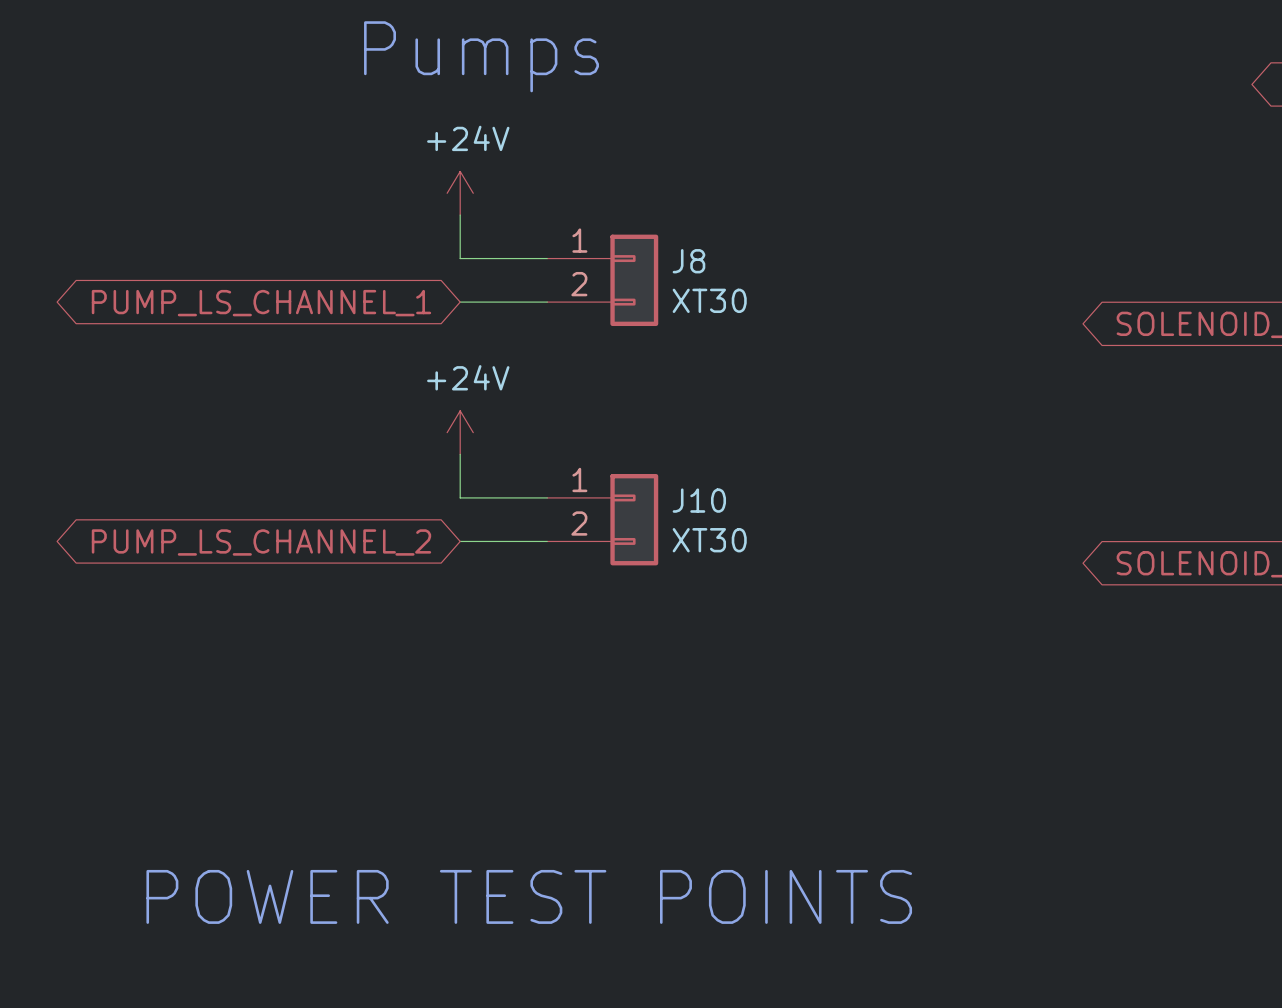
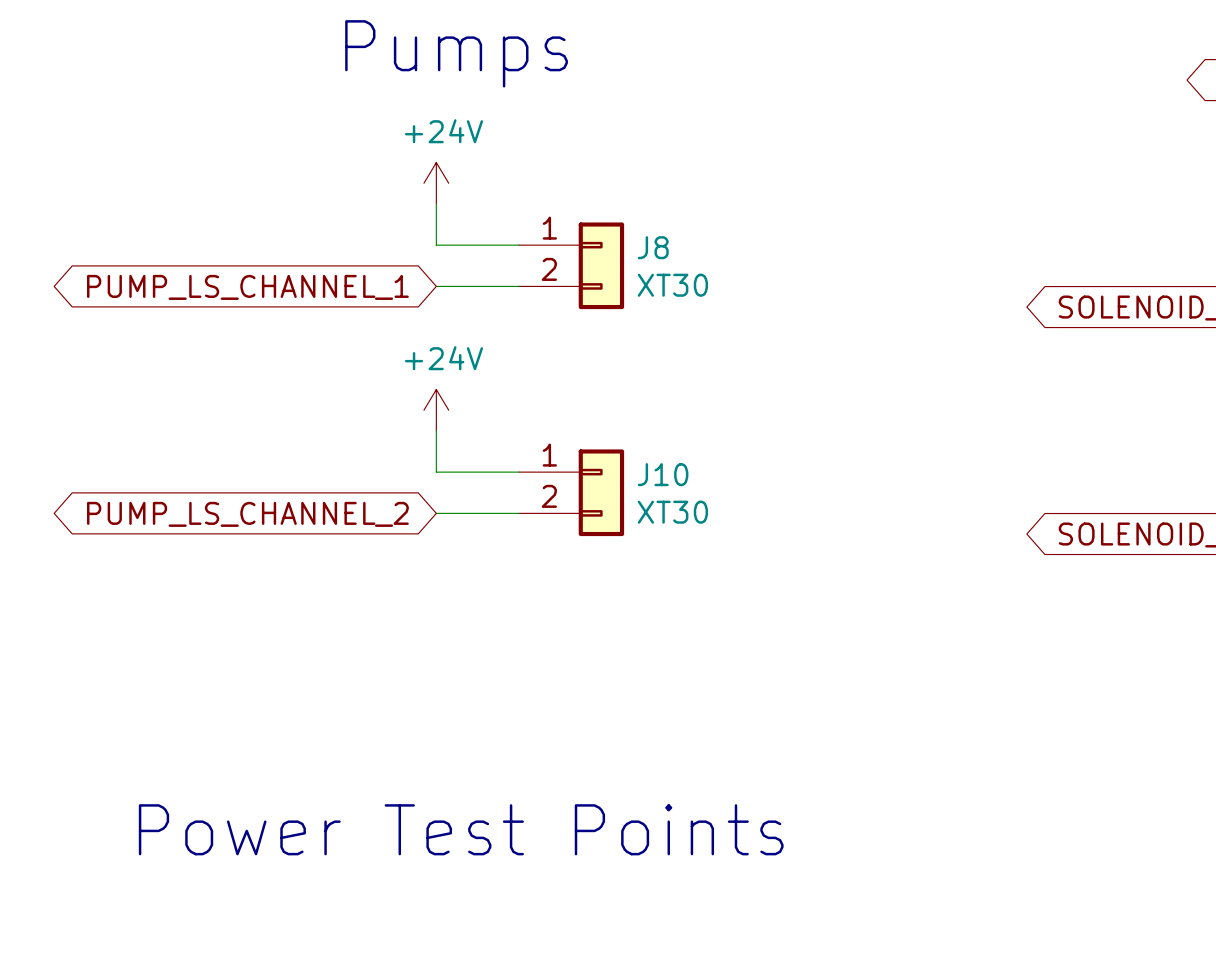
text: none -> Power Test Points (461, 829)
text: POWER TEST POINTS (529, 896) -> none

